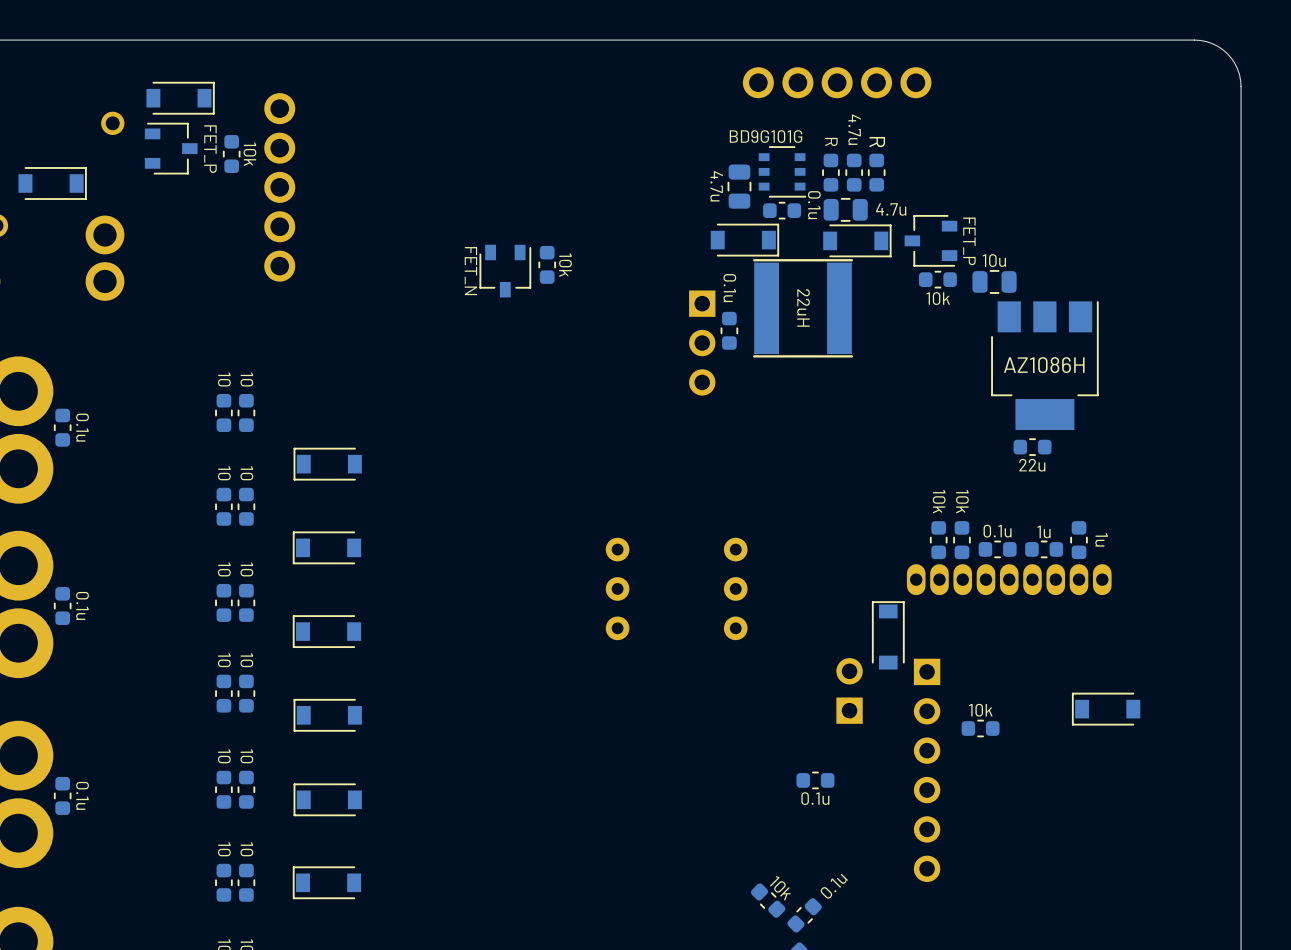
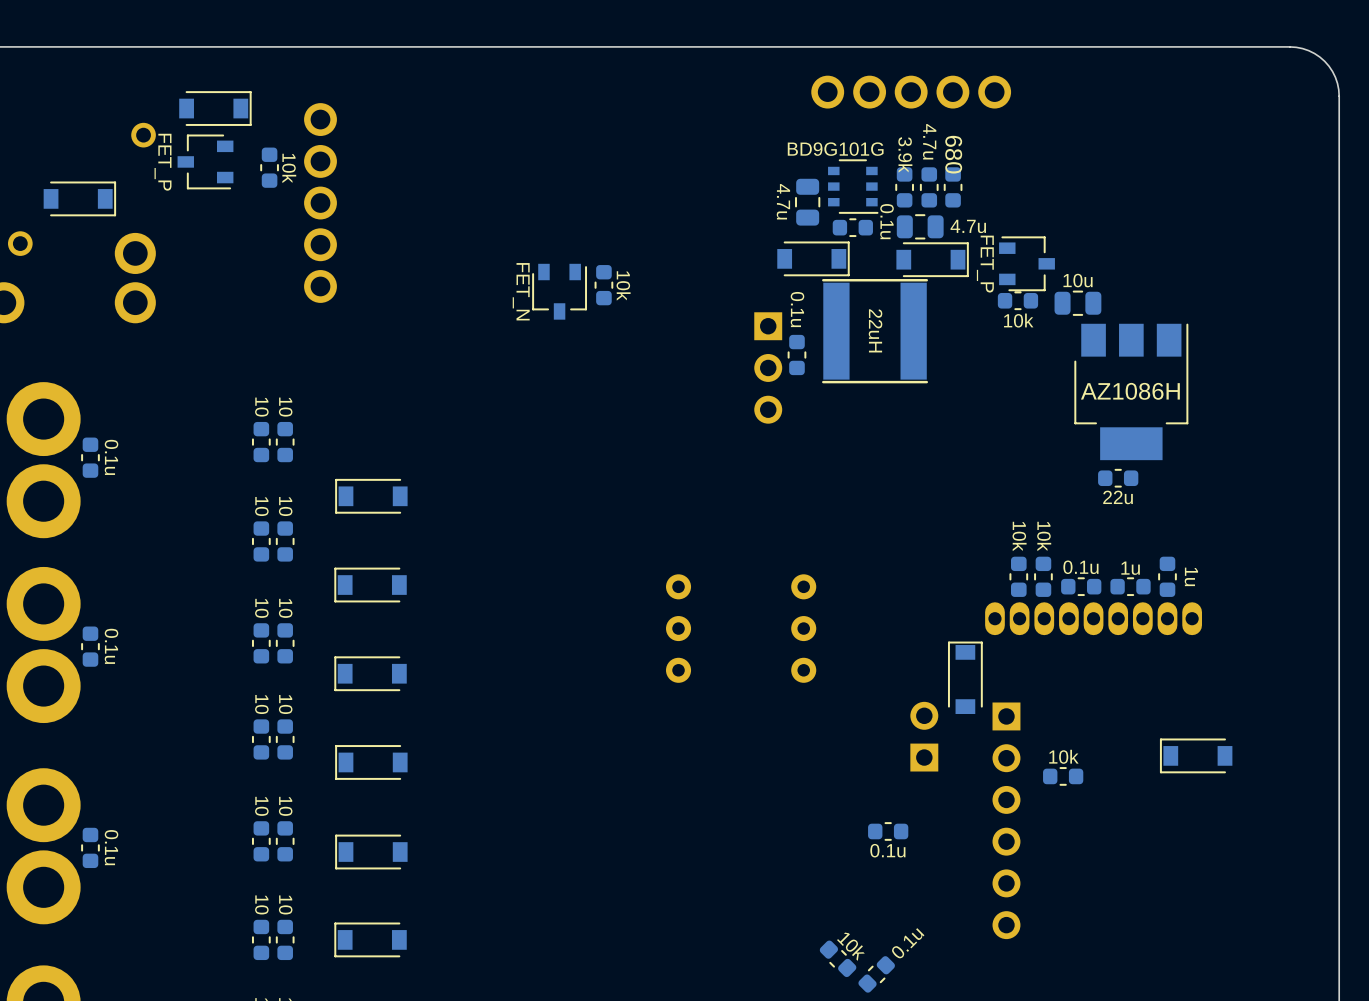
part value: R (831, 142) -> 3.9k (905, 154)
part value: R (877, 142) -> 680 (953, 154)
part rotation: 0° (171, 148) -> 180° (205, 161)
part rotation: 0° (930, 240) -> 180° (1027, 263)

